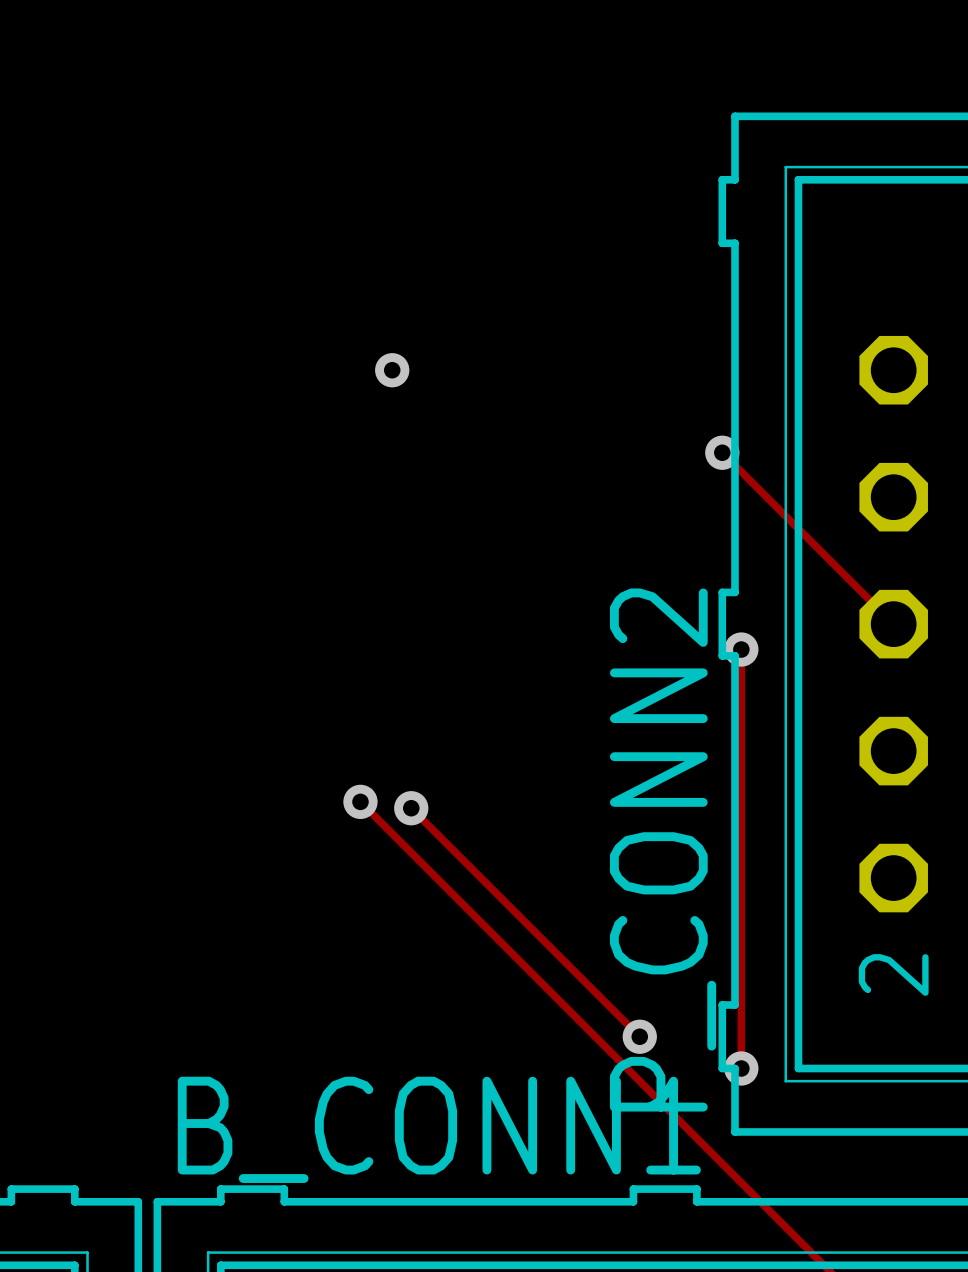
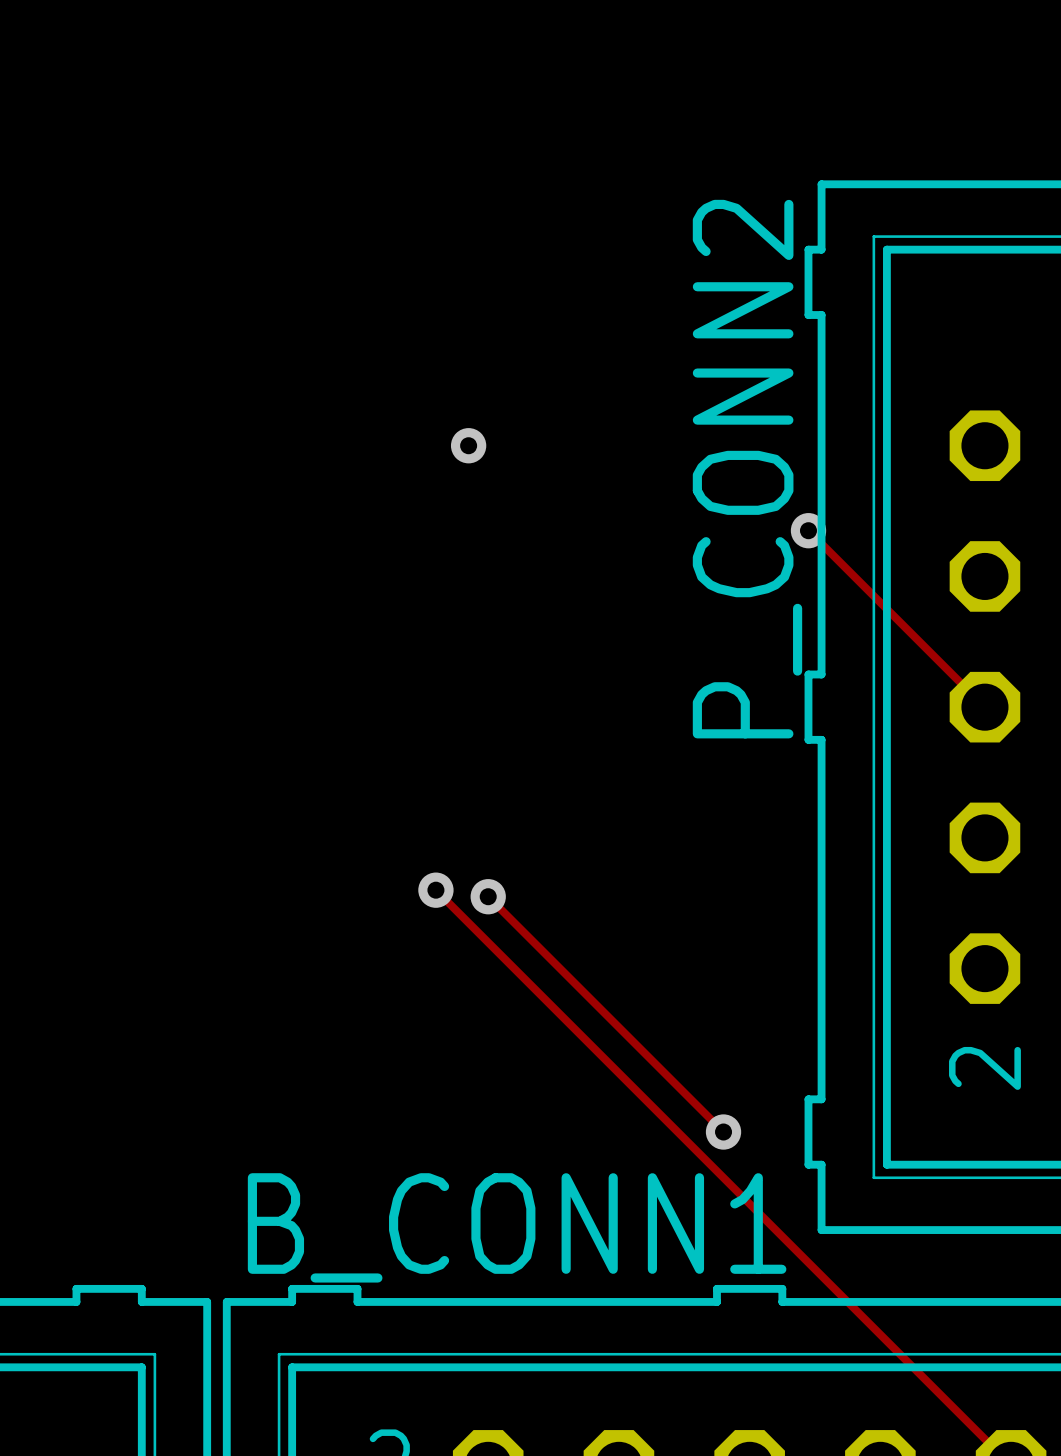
track: (741, 649) (741, 1068) -> none
via: (741, 649) -> none
P_CONN2 name position: P_CONN2 (663, 849) -> P_CONN2 (747, 469)
via: (741, 1068) -> none

